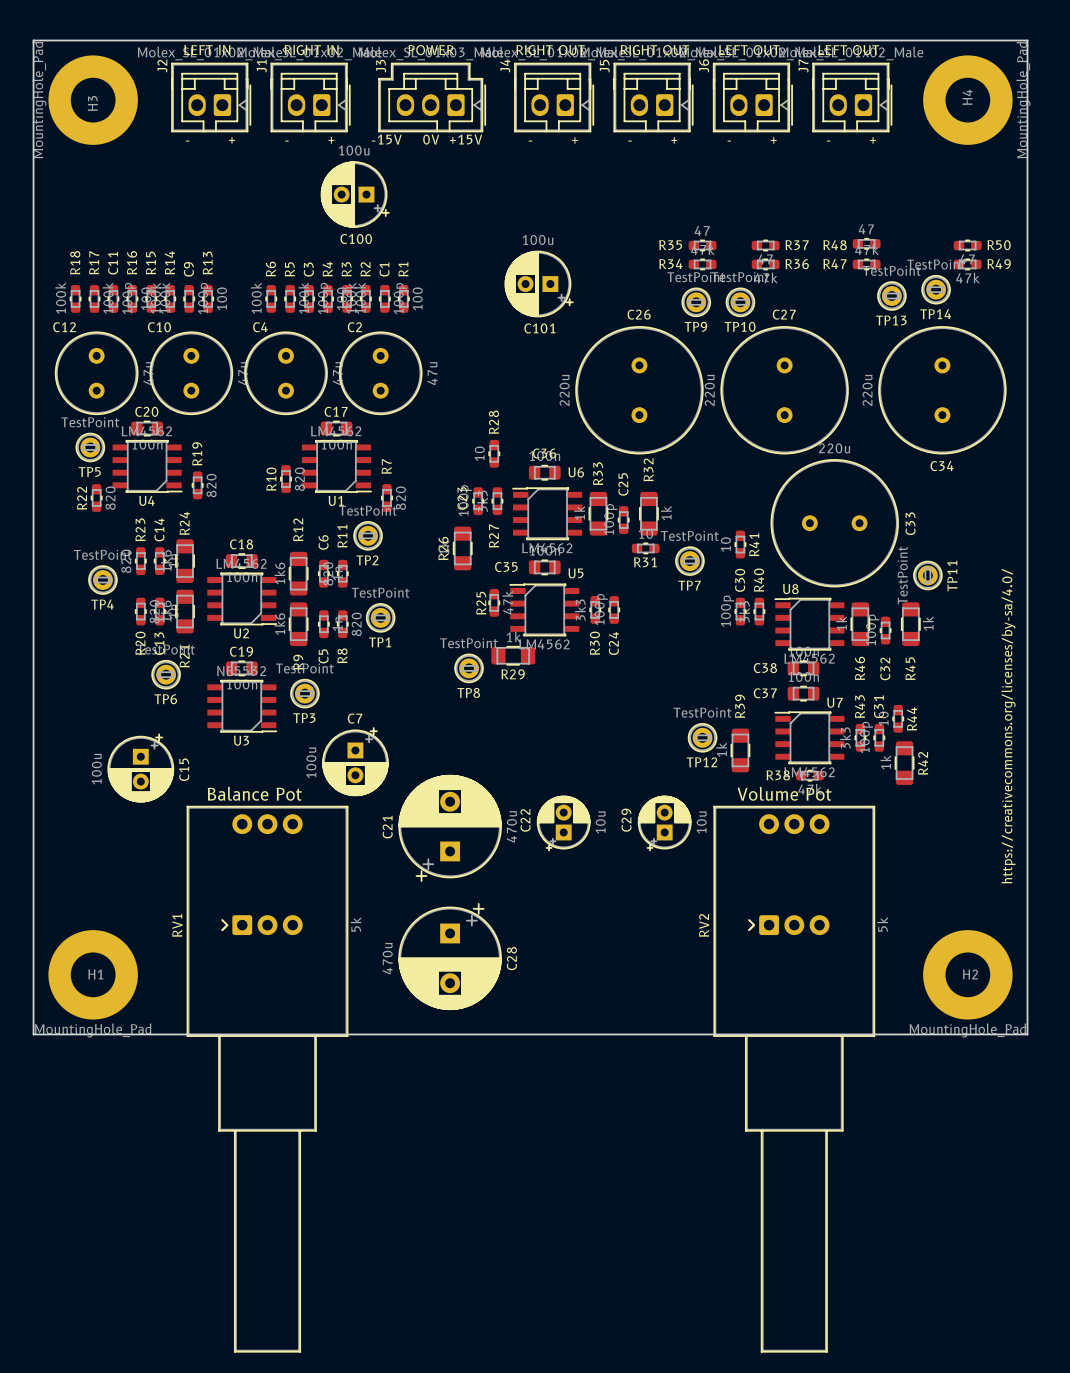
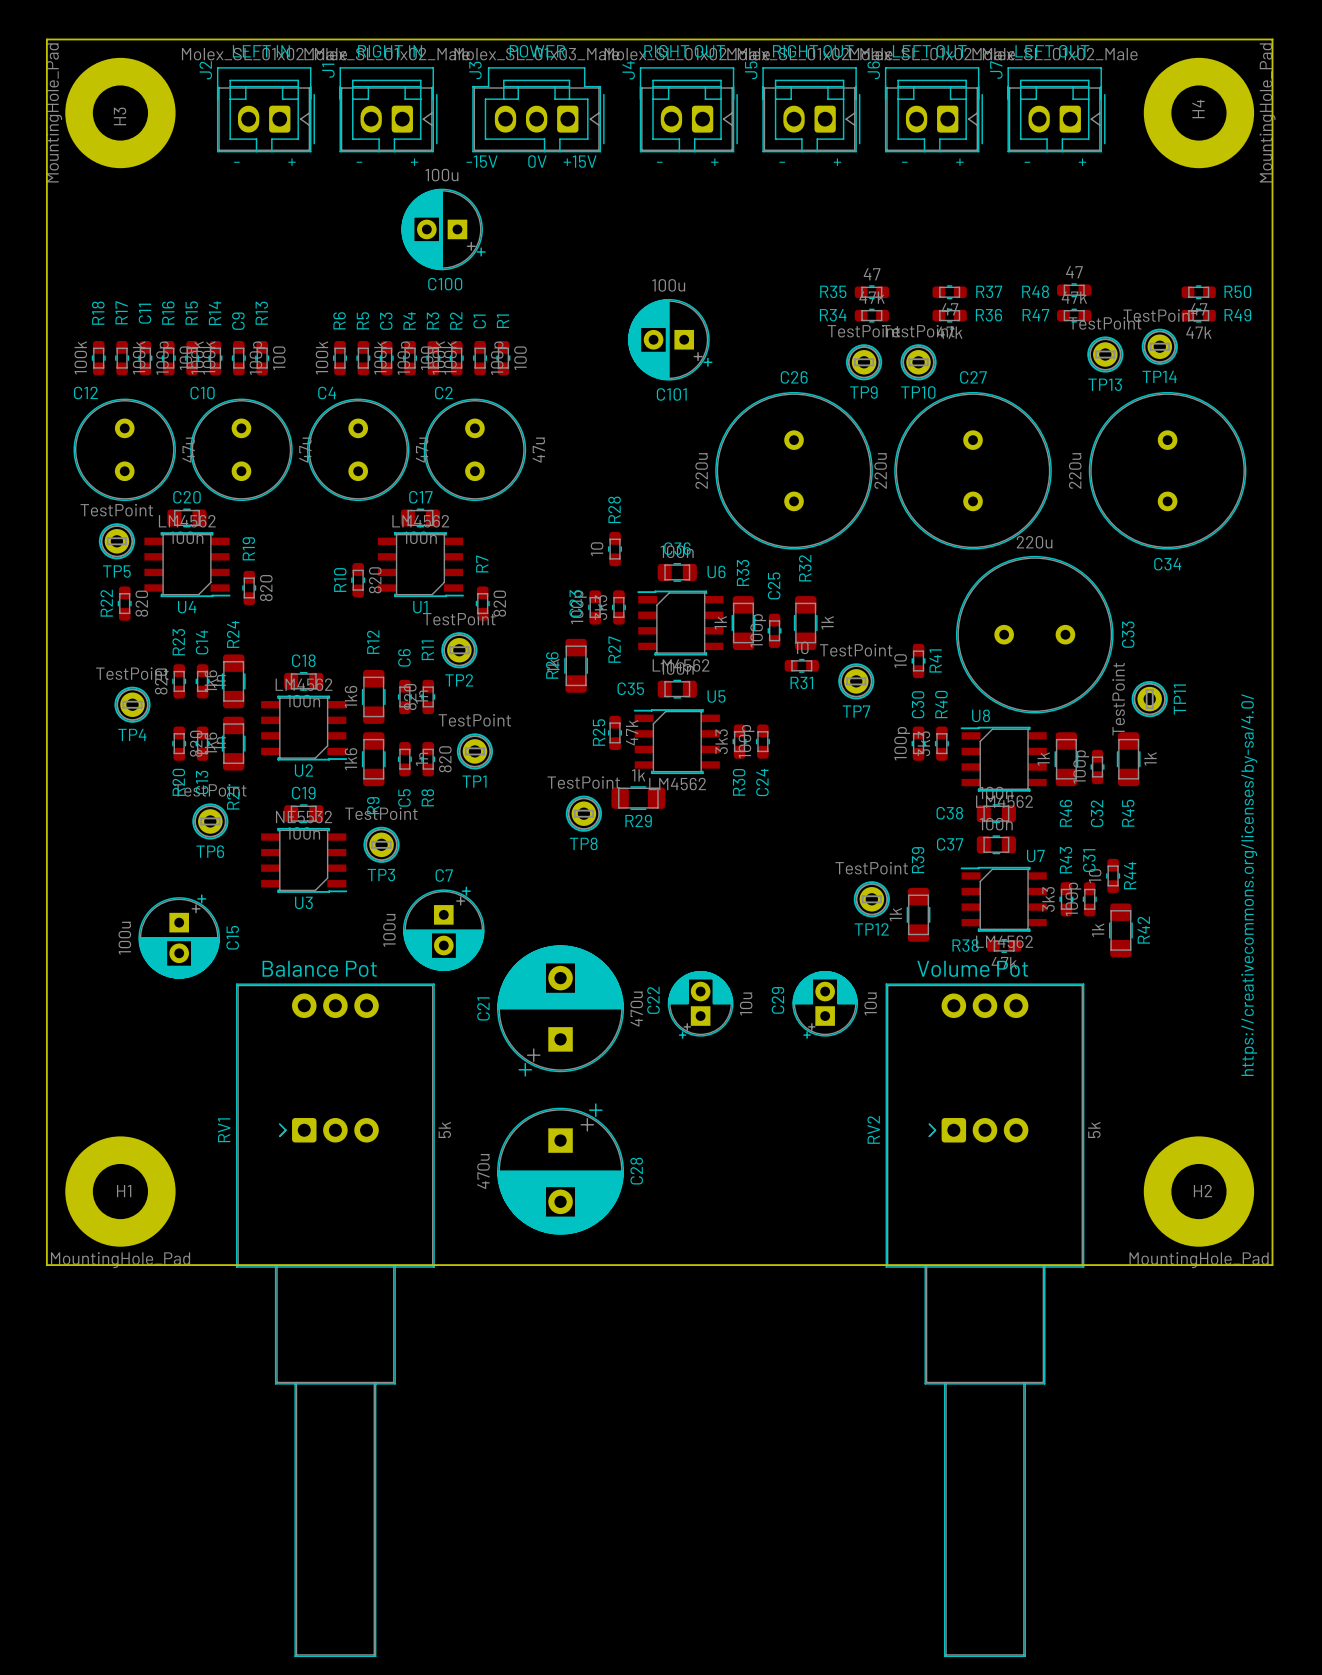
J2 footprint: [171, 62, 251, 133] -> [216, 67, 315, 153]
J1 footprint: [270, 62, 351, 133] -> [339, 67, 438, 153]
J3 footprint: [378, 62, 486, 133] -> [472, 67, 605, 153]
J4 footprint: [514, 62, 594, 133] -> [639, 67, 738, 153]
J5 footprint: [613, 62, 694, 133] -> [762, 67, 861, 153]
J6 footprint: [713, 62, 793, 133] -> [884, 67, 983, 153]
J7 footprint: [812, 62, 893, 133] -> [1007, 67, 1106, 153]

